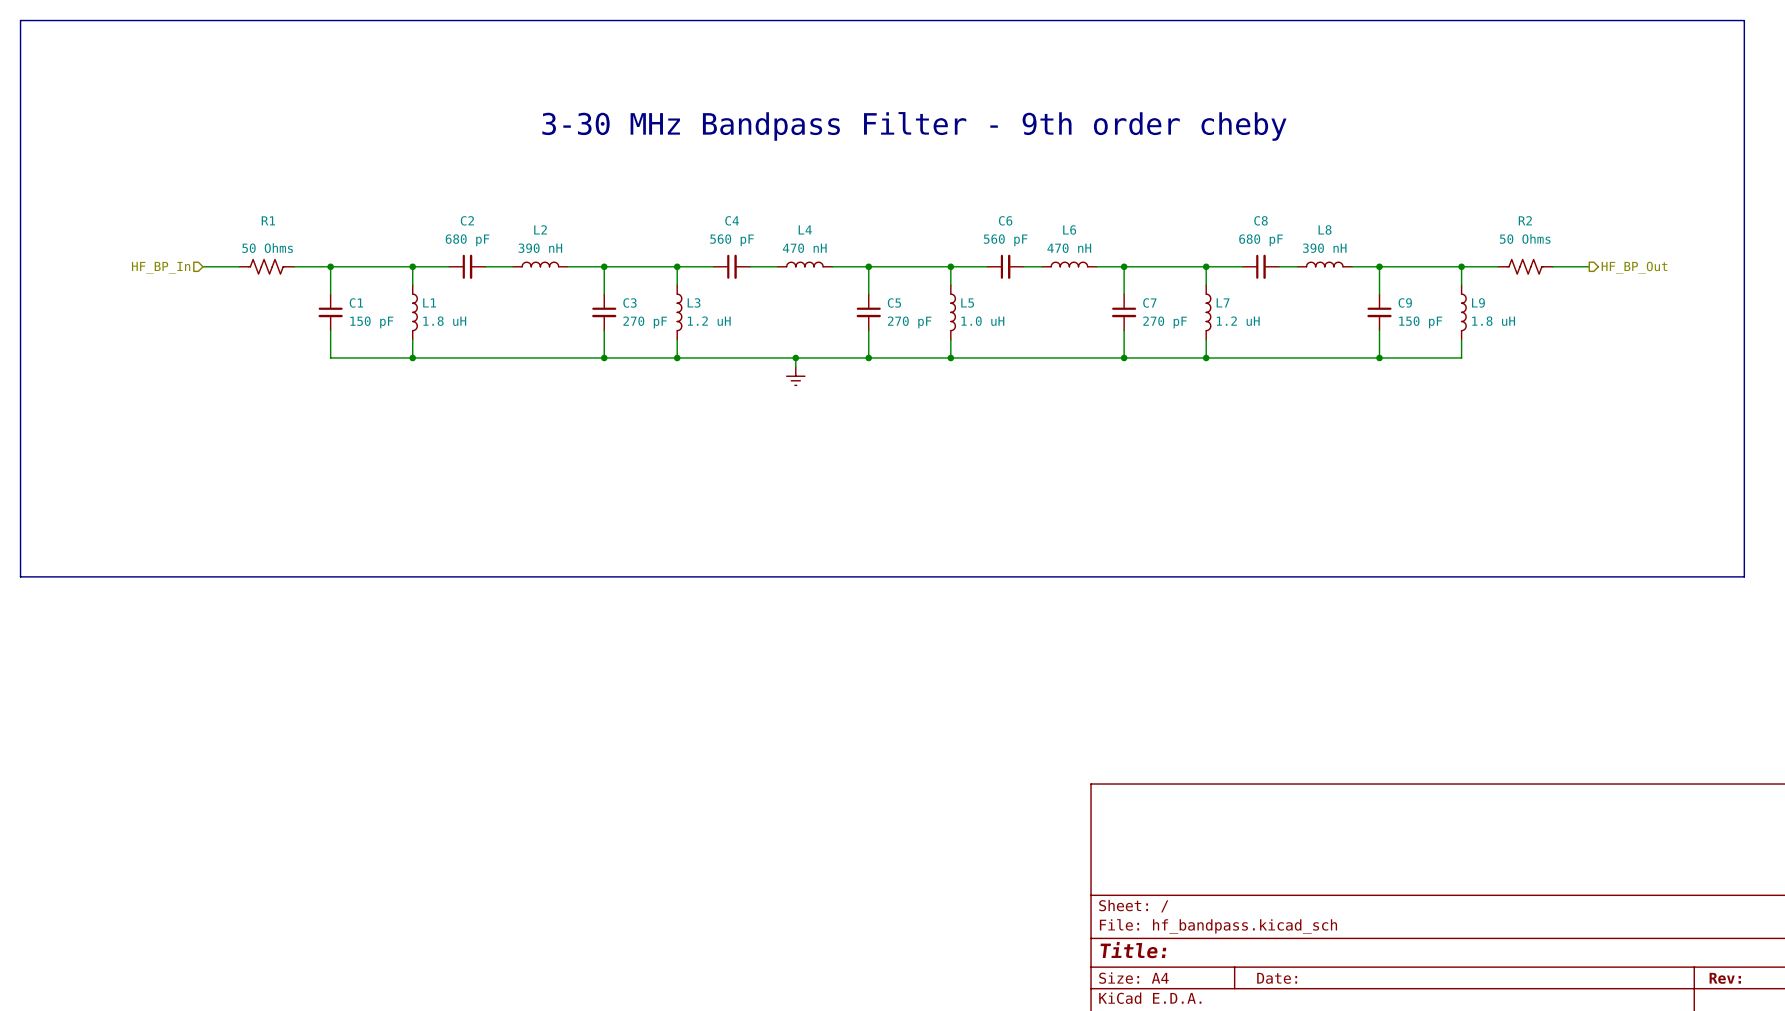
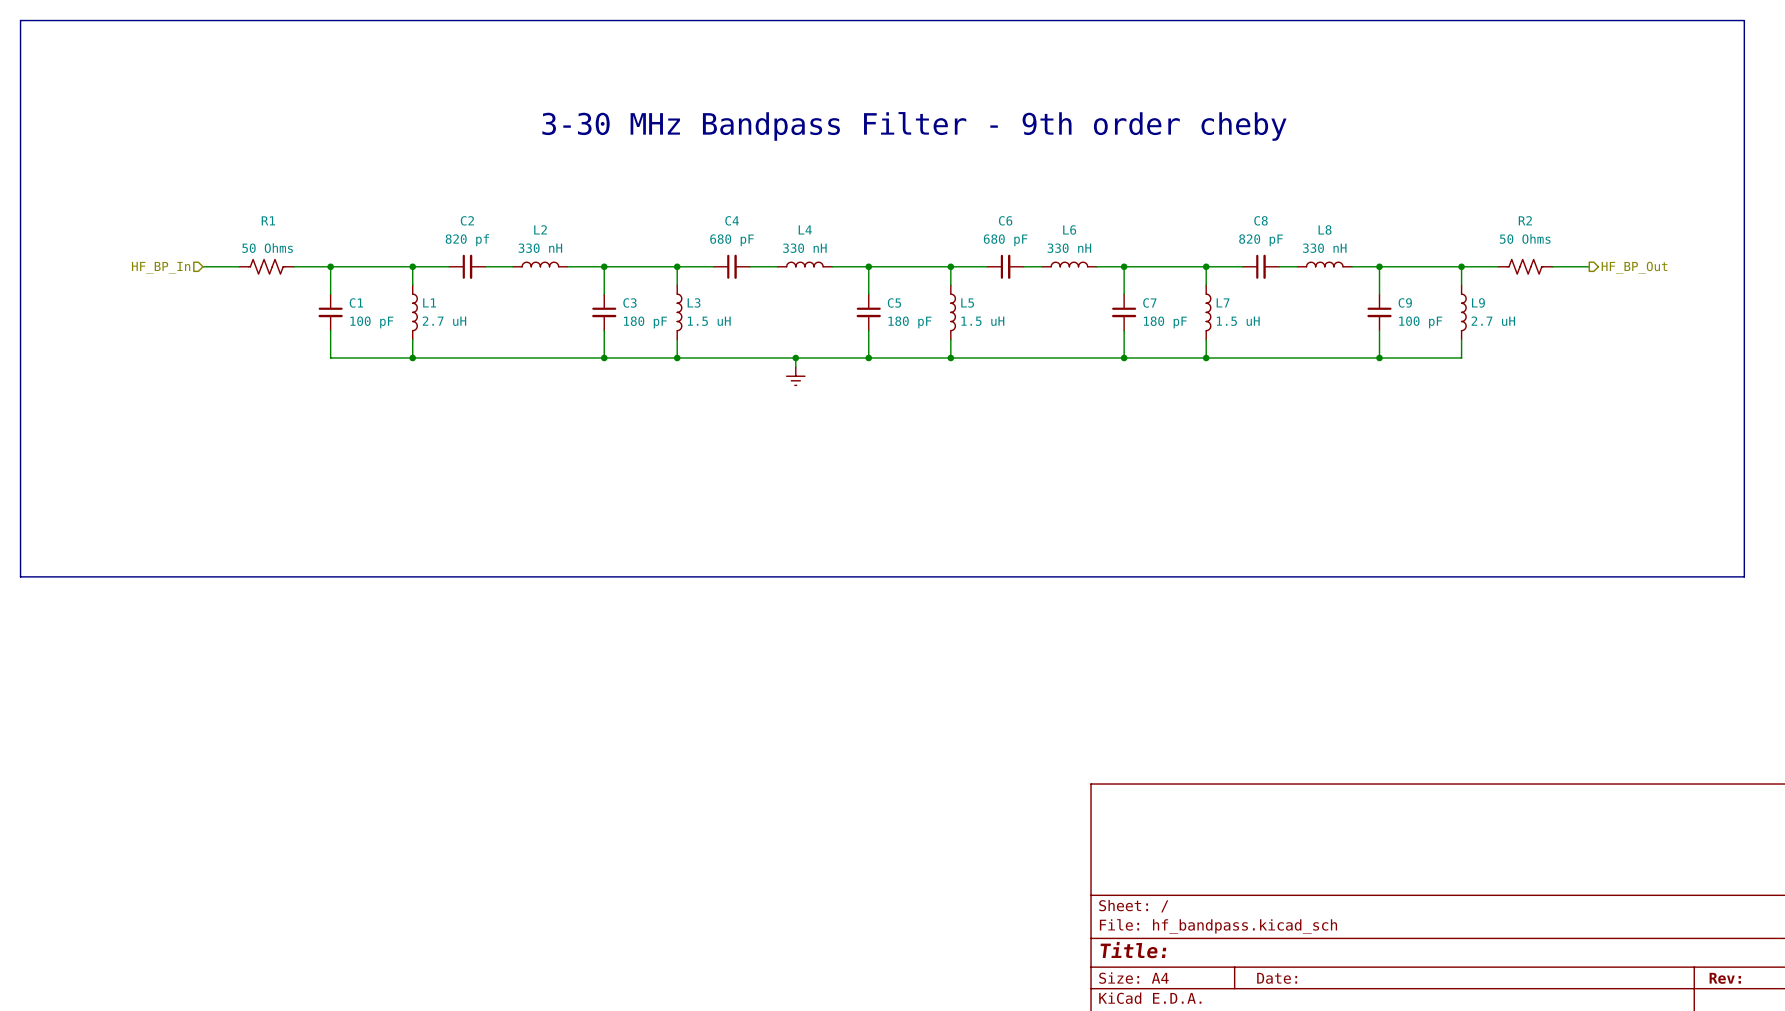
C2 value: 680 pF (467, 240) -> 820 pf (467, 240)
C4 value: 560 pF (732, 240) -> 680 pF (732, 240)
C6 value: 560 pF (1005, 240) -> 680 pF (1005, 240)
C8 value: 680 pF (1261, 240) -> 820 pF (1261, 240)
L2 value: 390 nH (540, 248) -> 330 nH (540, 248)
L4 value: 470 nH (804, 248) -> 330 nH (804, 248)
L6 value: 470 nH (1069, 248) -> 330 nH (1069, 248)
L8 value: 390 nH (1324, 248) -> 330 nH (1324, 248)
L1 value: 1.8 uH (444, 321) -> 2.7 uH (444, 321)
L3 value: 1.2 uH (709, 321) -> 1.5 uH (709, 321)
L5 value: 1.0 uH (982, 321) -> 1.5 uH (982, 321)
L7 value: 1.2 uH (1238, 321) -> 1.5 uH (1238, 321)
L9 value: 1.8 uH (1493, 321) -> 2.7 uH (1493, 321)
C1 value: 150 pF (371, 322) -> 100 pF (371, 322)
C3 value: 270 pF (645, 322) -> 180 pF (645, 322)
C5 value: 270 pF (909, 322) -> 180 pF (909, 322)
C7 value: 270 pF (1165, 322) -> 180 pF (1165, 322)
C9 value: 150 pF (1420, 322) -> 100 pF (1420, 322)

